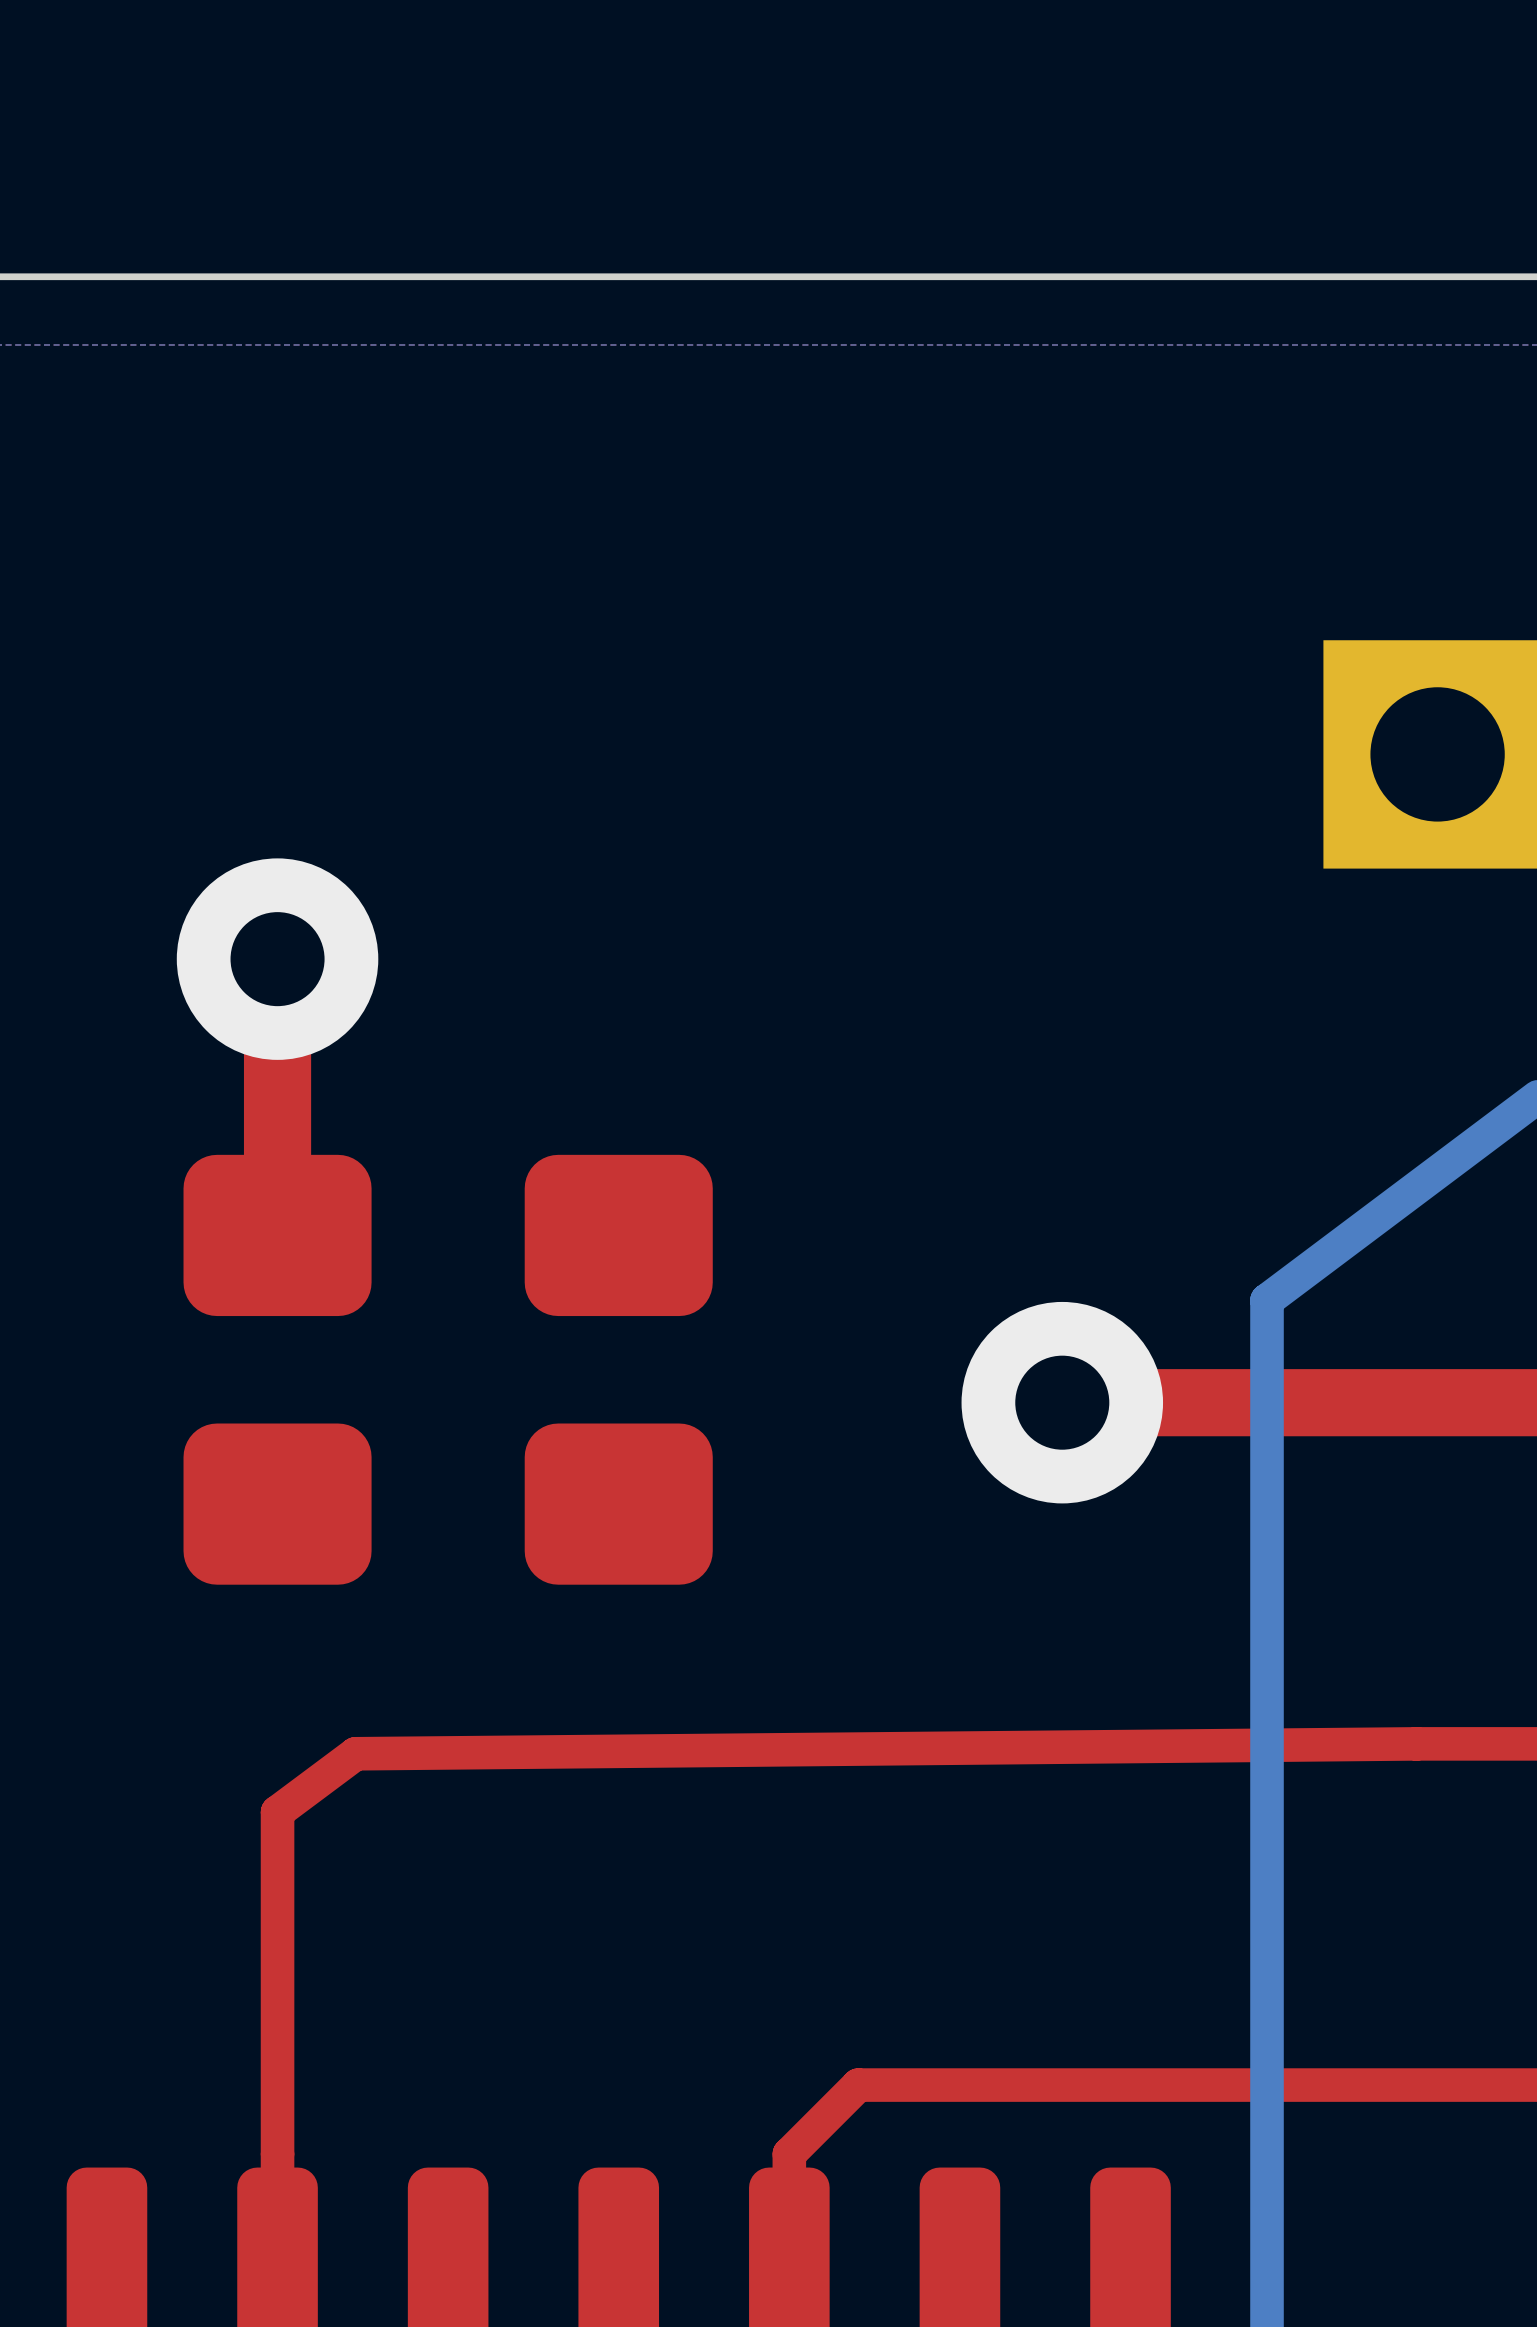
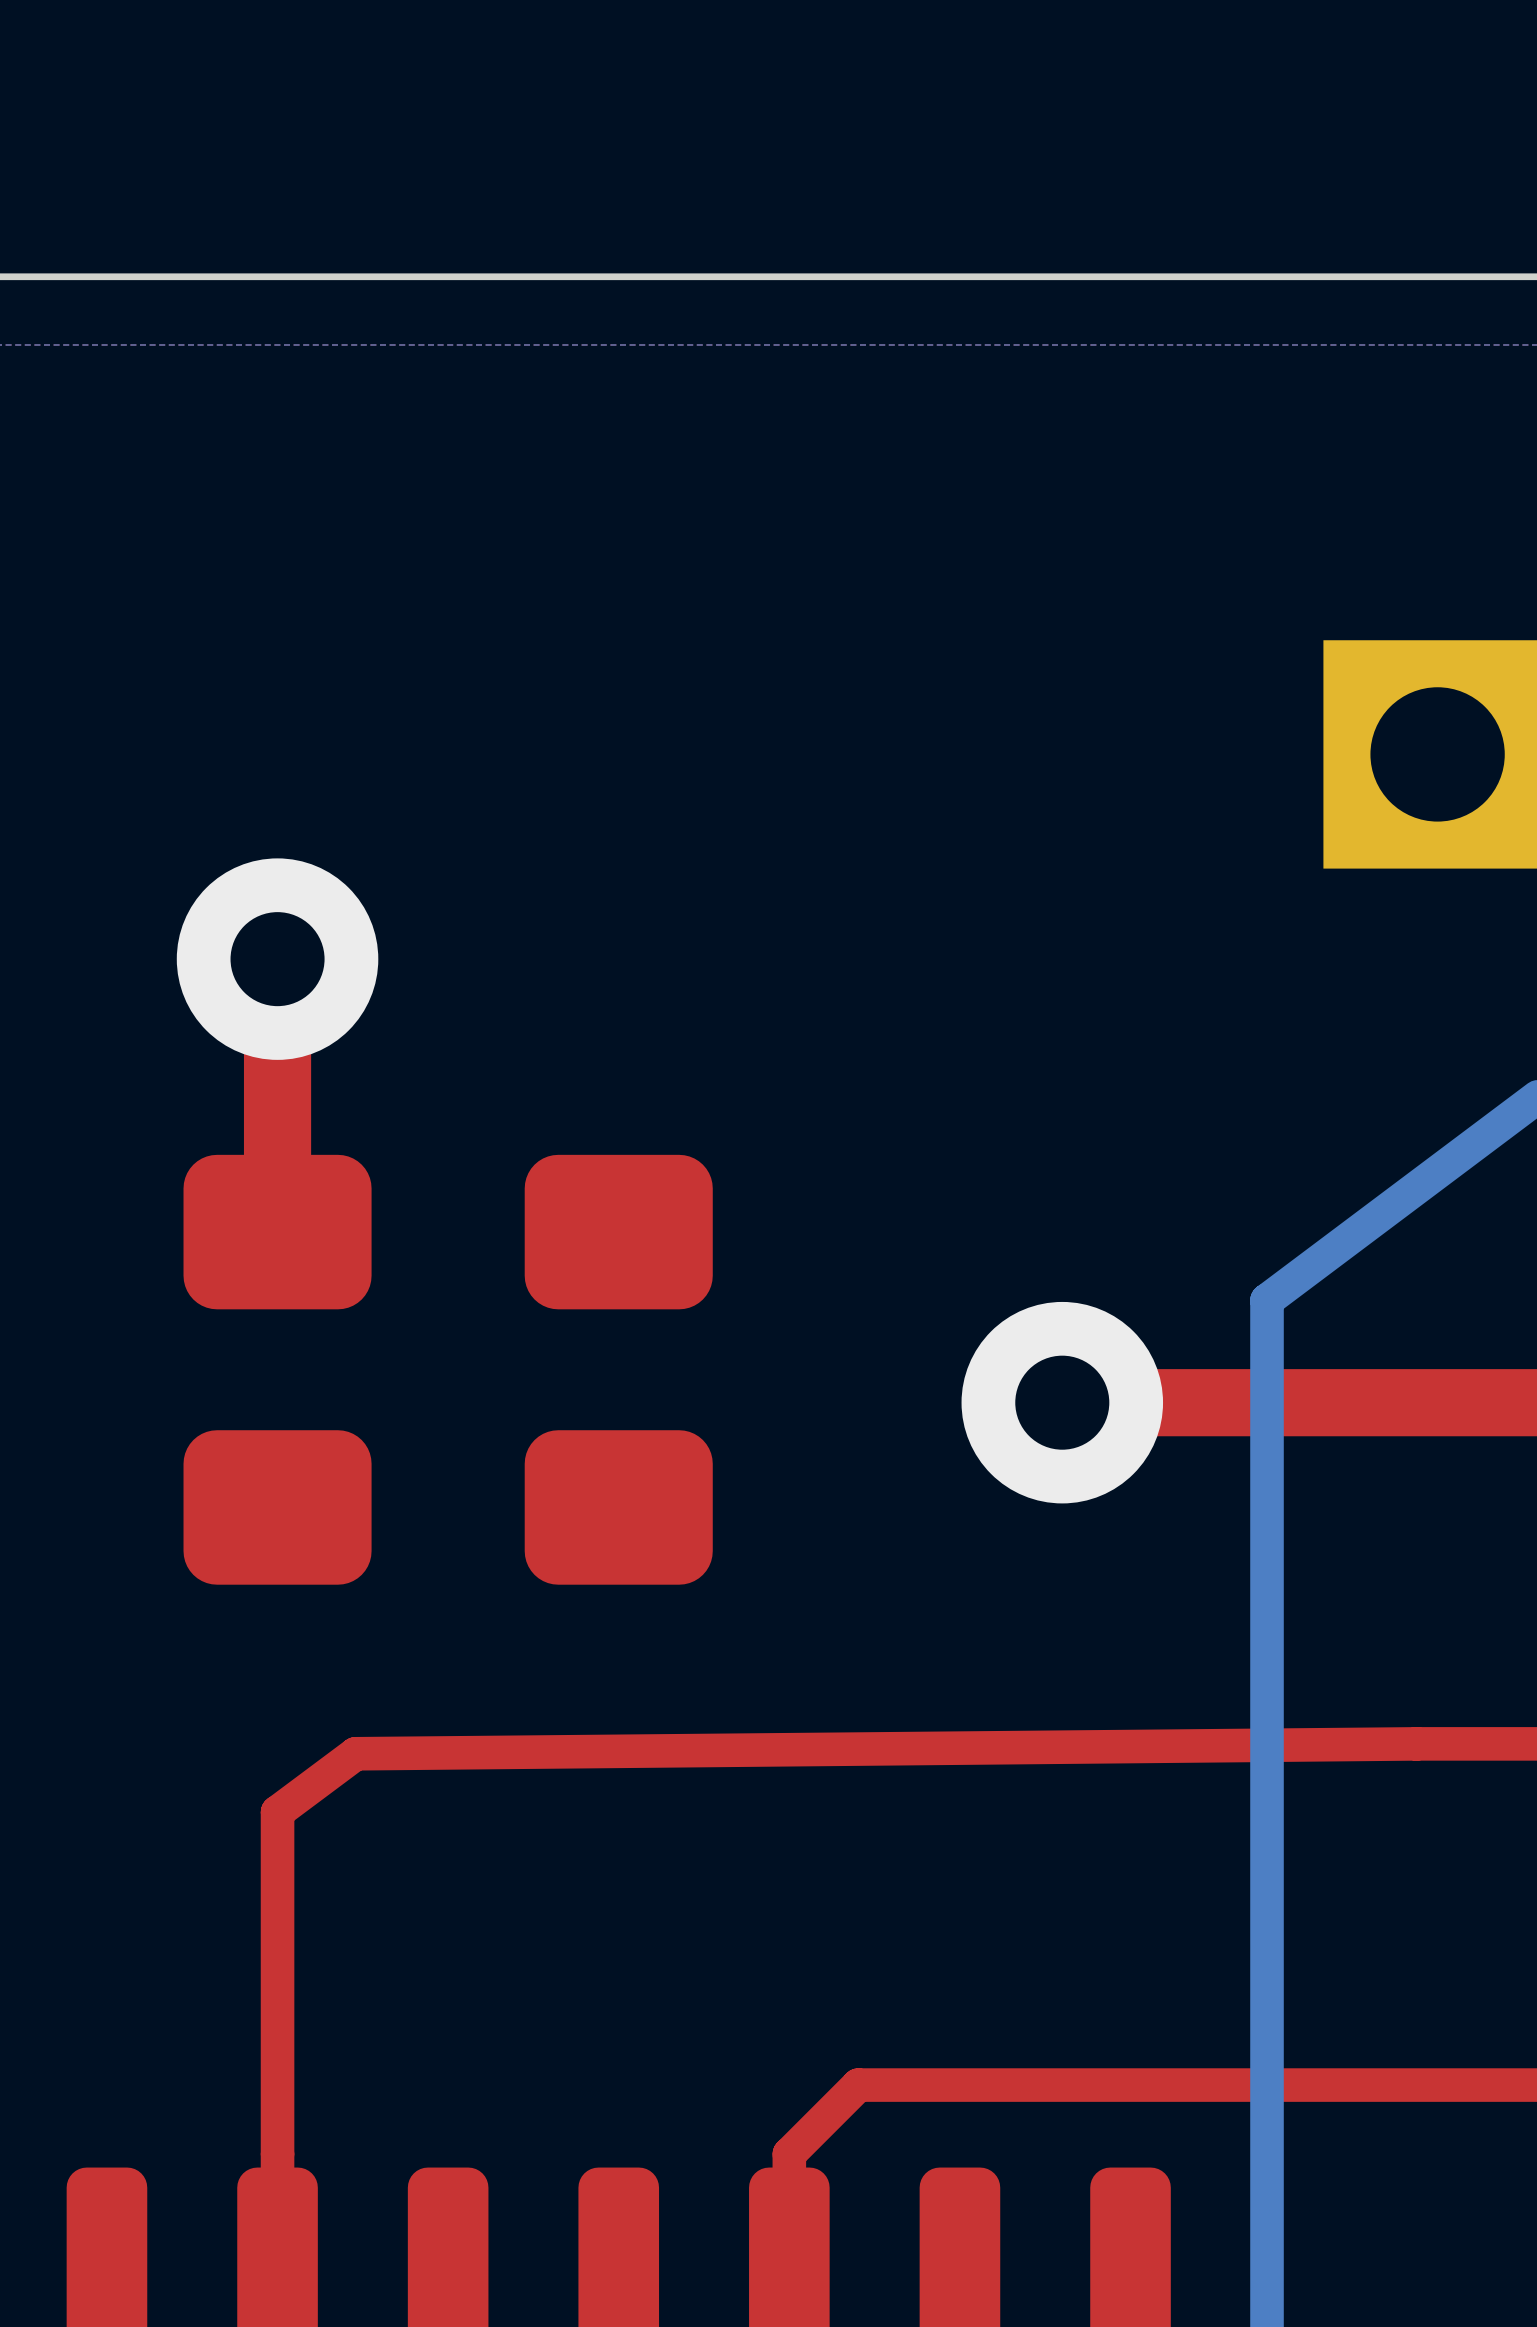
part footprint: [183, 1154, 372, 1585] -> [183, 1154, 372, 1585]
part footprint: [524, 1154, 713, 1585] -> [524, 1154, 713, 1585]

